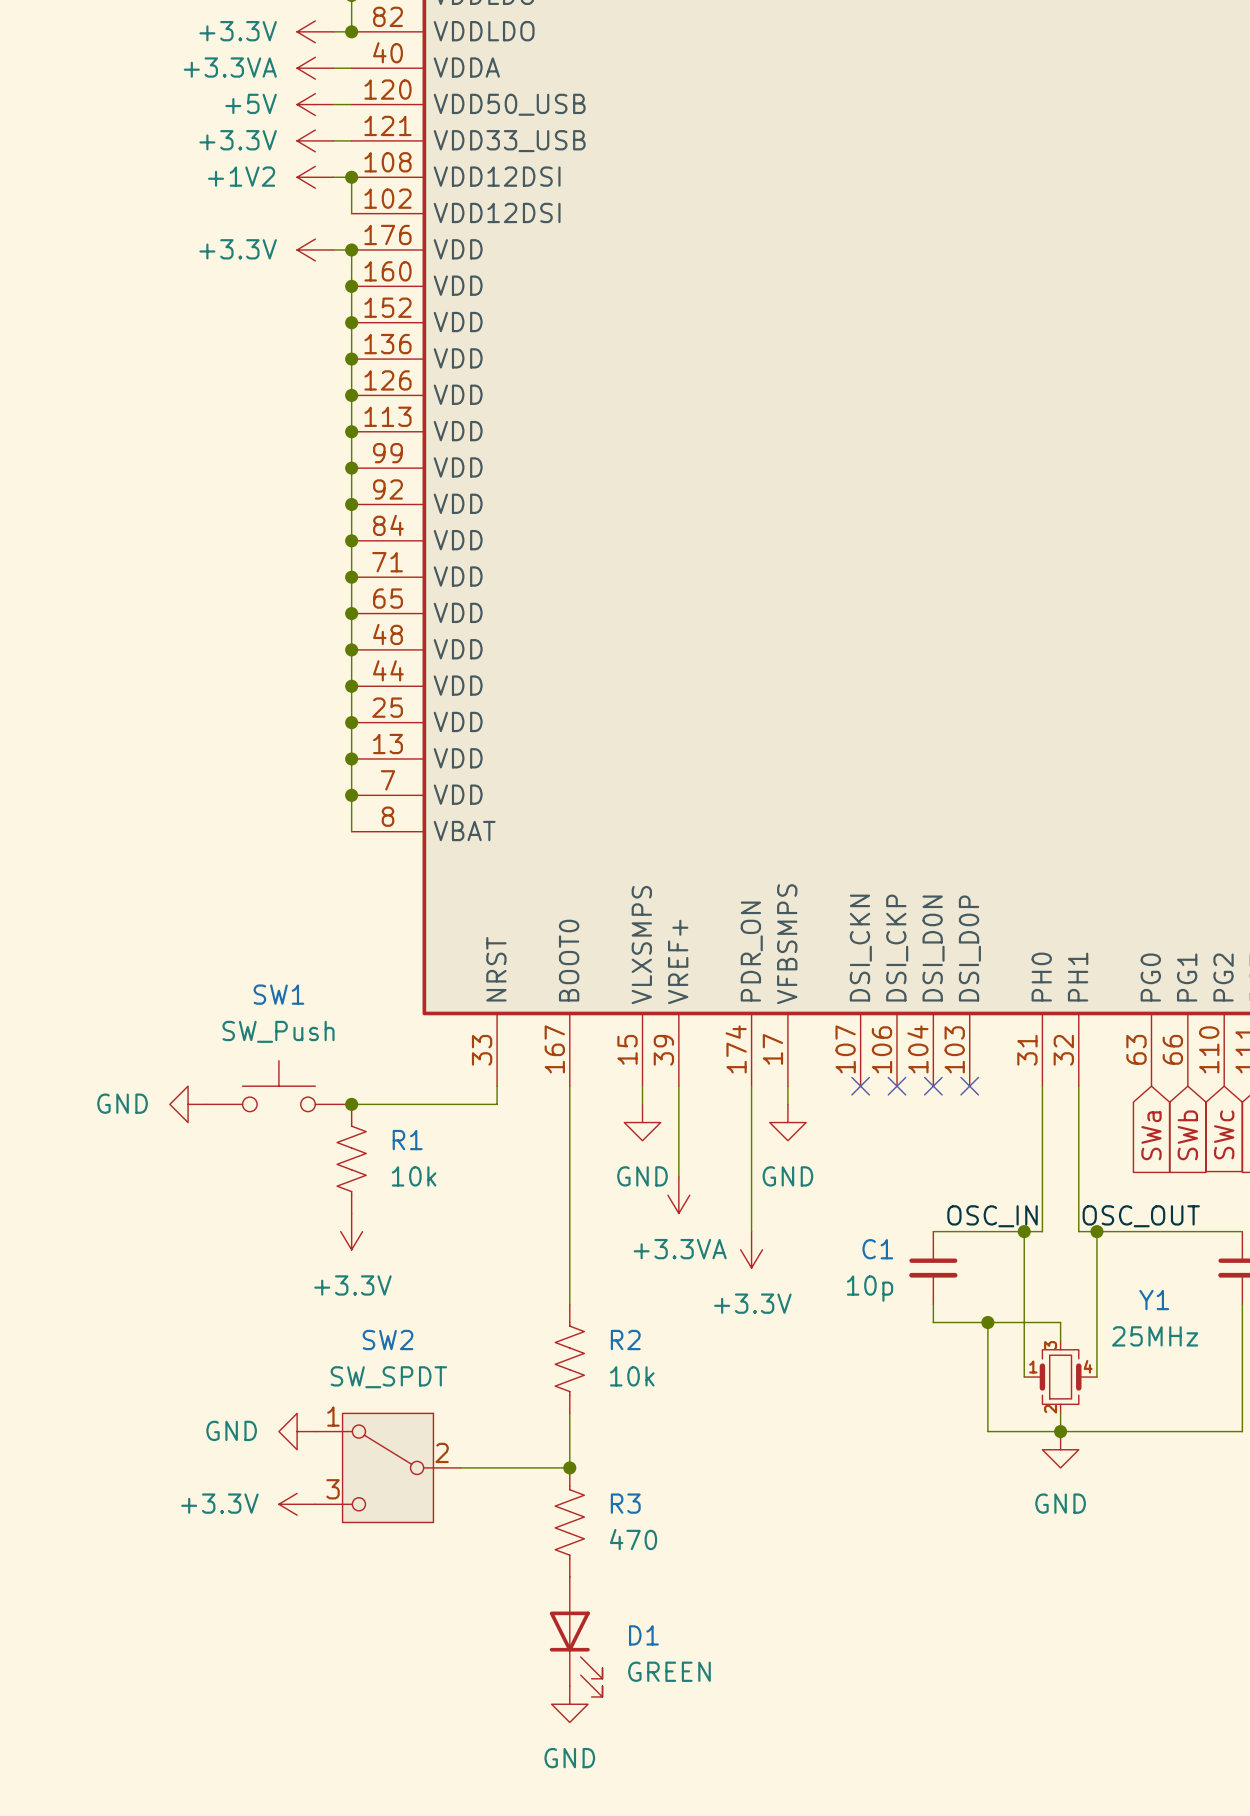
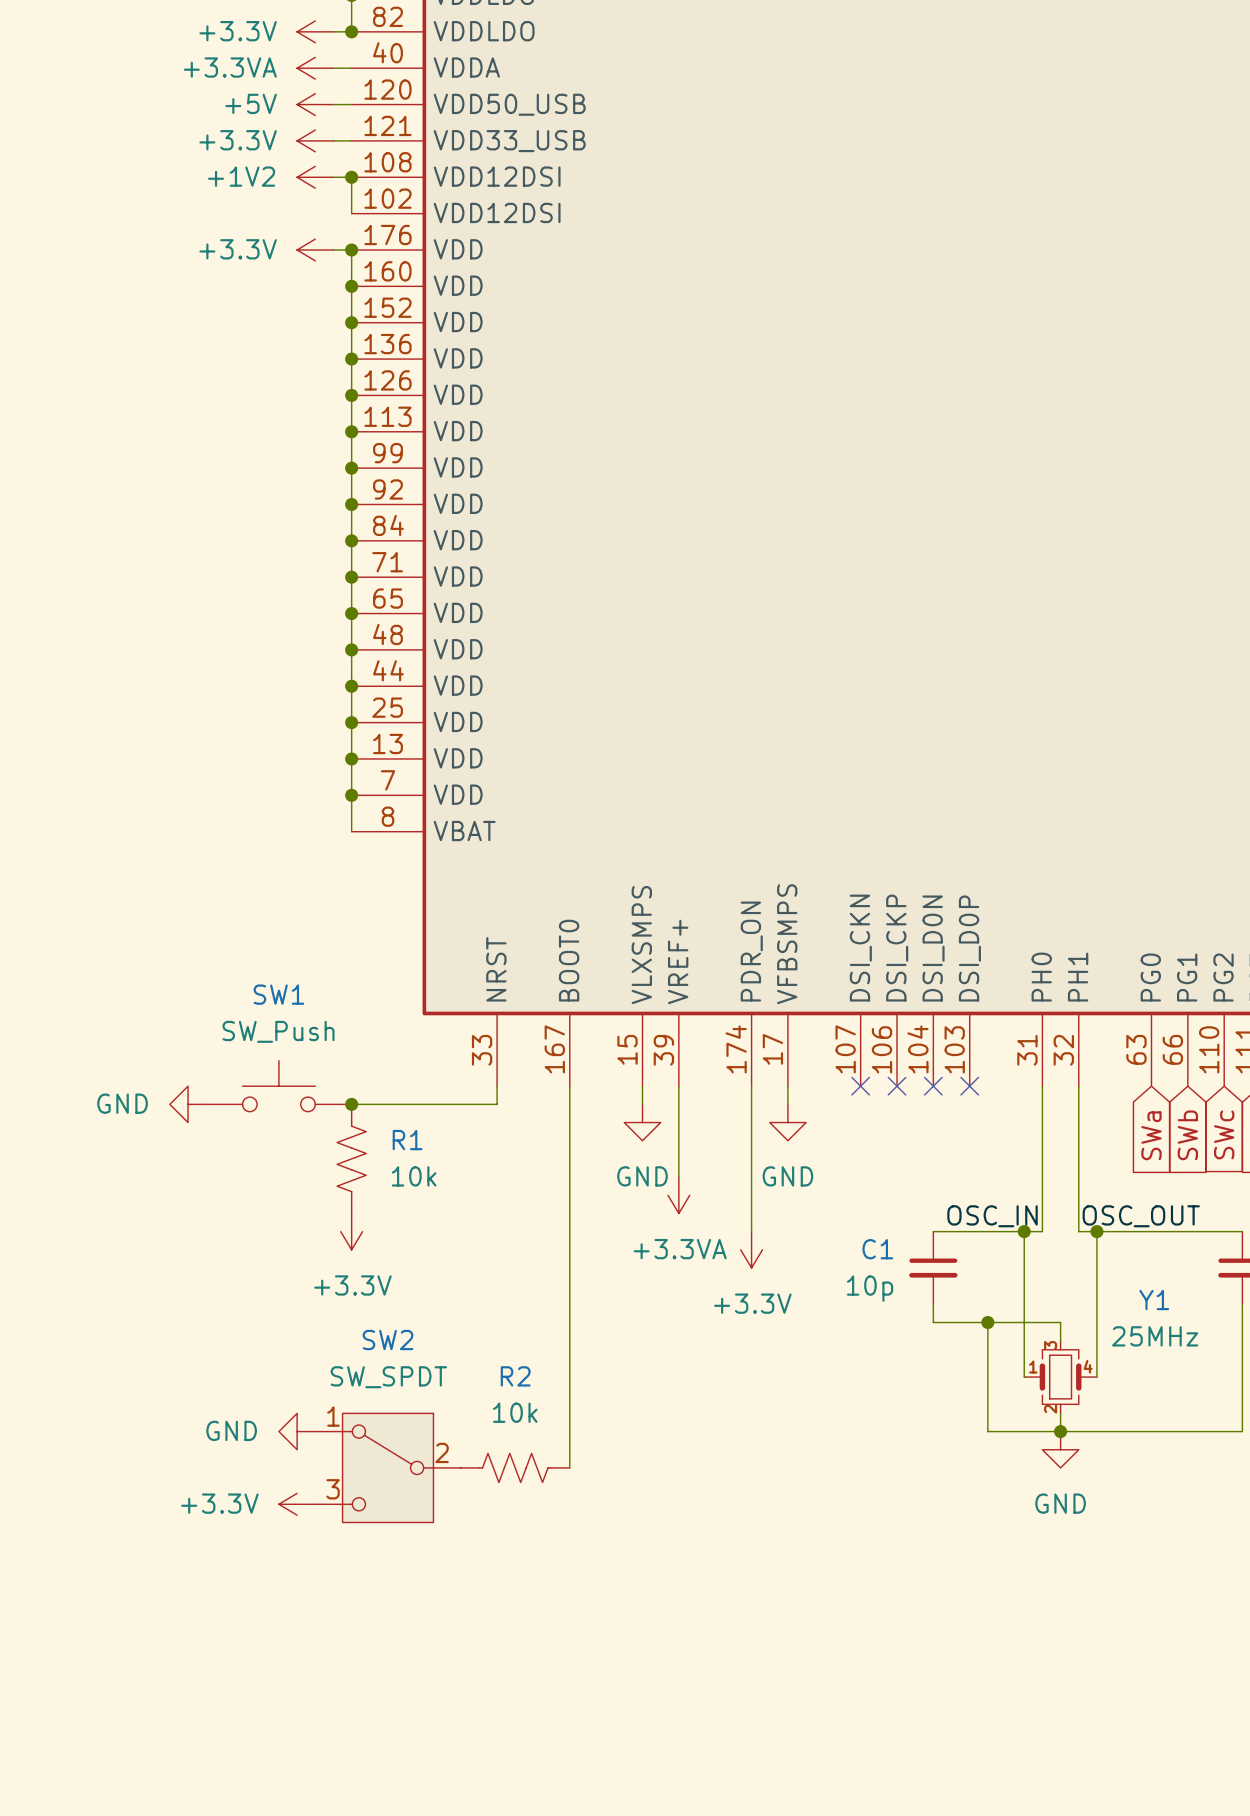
wire: none -> (569, 1304) (569, 1413)
R2 name position: R2 (625, 1340) -> R2 (515, 1376)
R2 rotation: 0° (569, 1358) -> 90° clockwise (515, 1467)
R2 position: (569, 1358) -> (515, 1467)
R2 value position: 10k (632, 1376) -> 10k (515, 1412)
wire: (460, 1467) (569, 1467) -> none
junction: (569, 1467) -> none
R3: 470 (569, 1522) -> none
D1: GREEN (576, 1636) -> none
power symbol: GND (569, 1704) -> none

